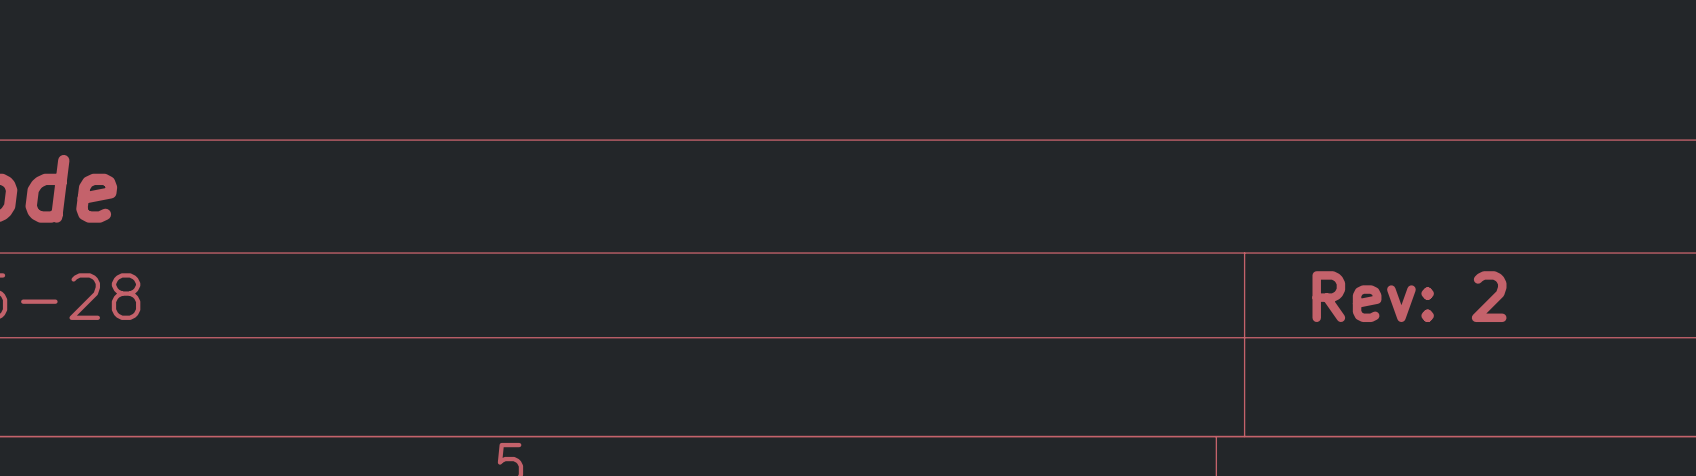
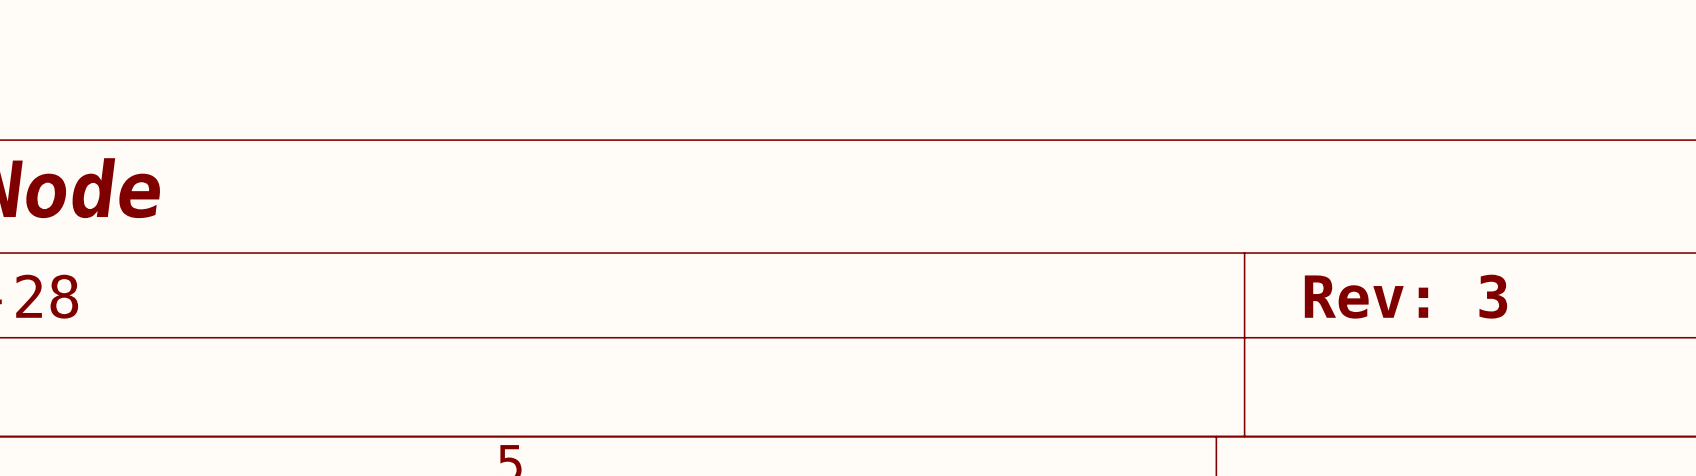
title block: Rev: 2 (1409, 296) -> Rev: 3 (1405, 296)

